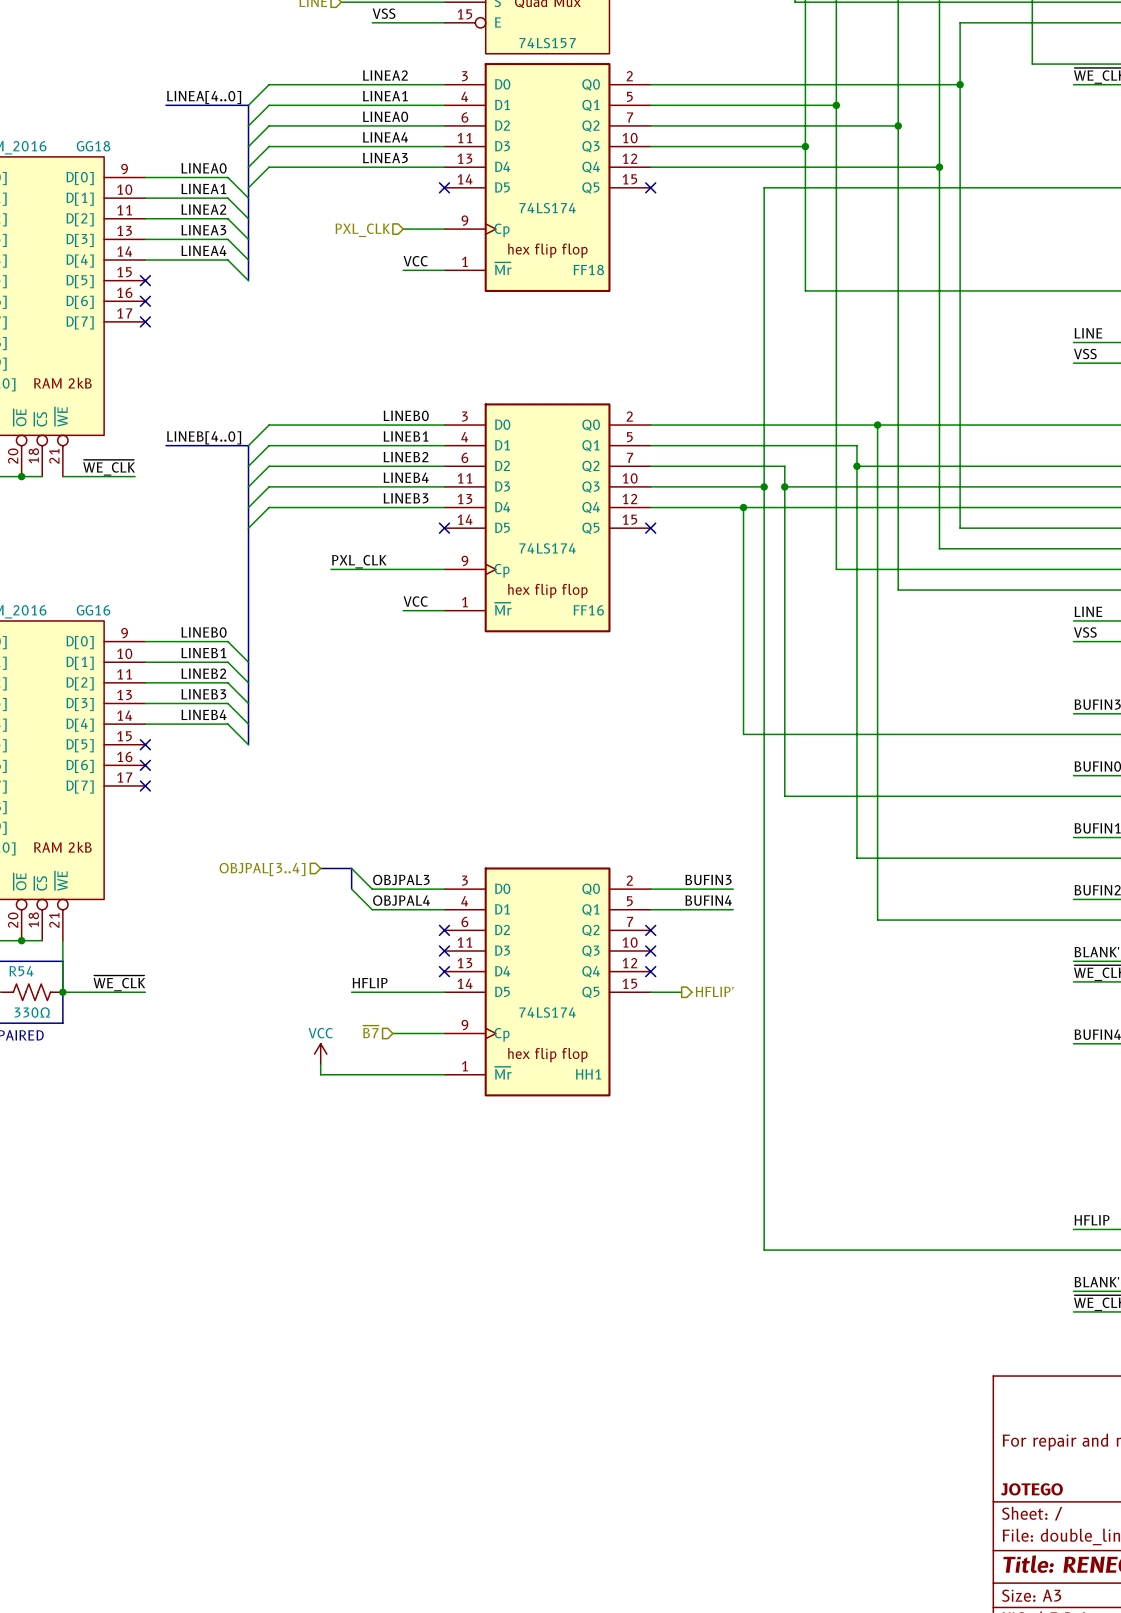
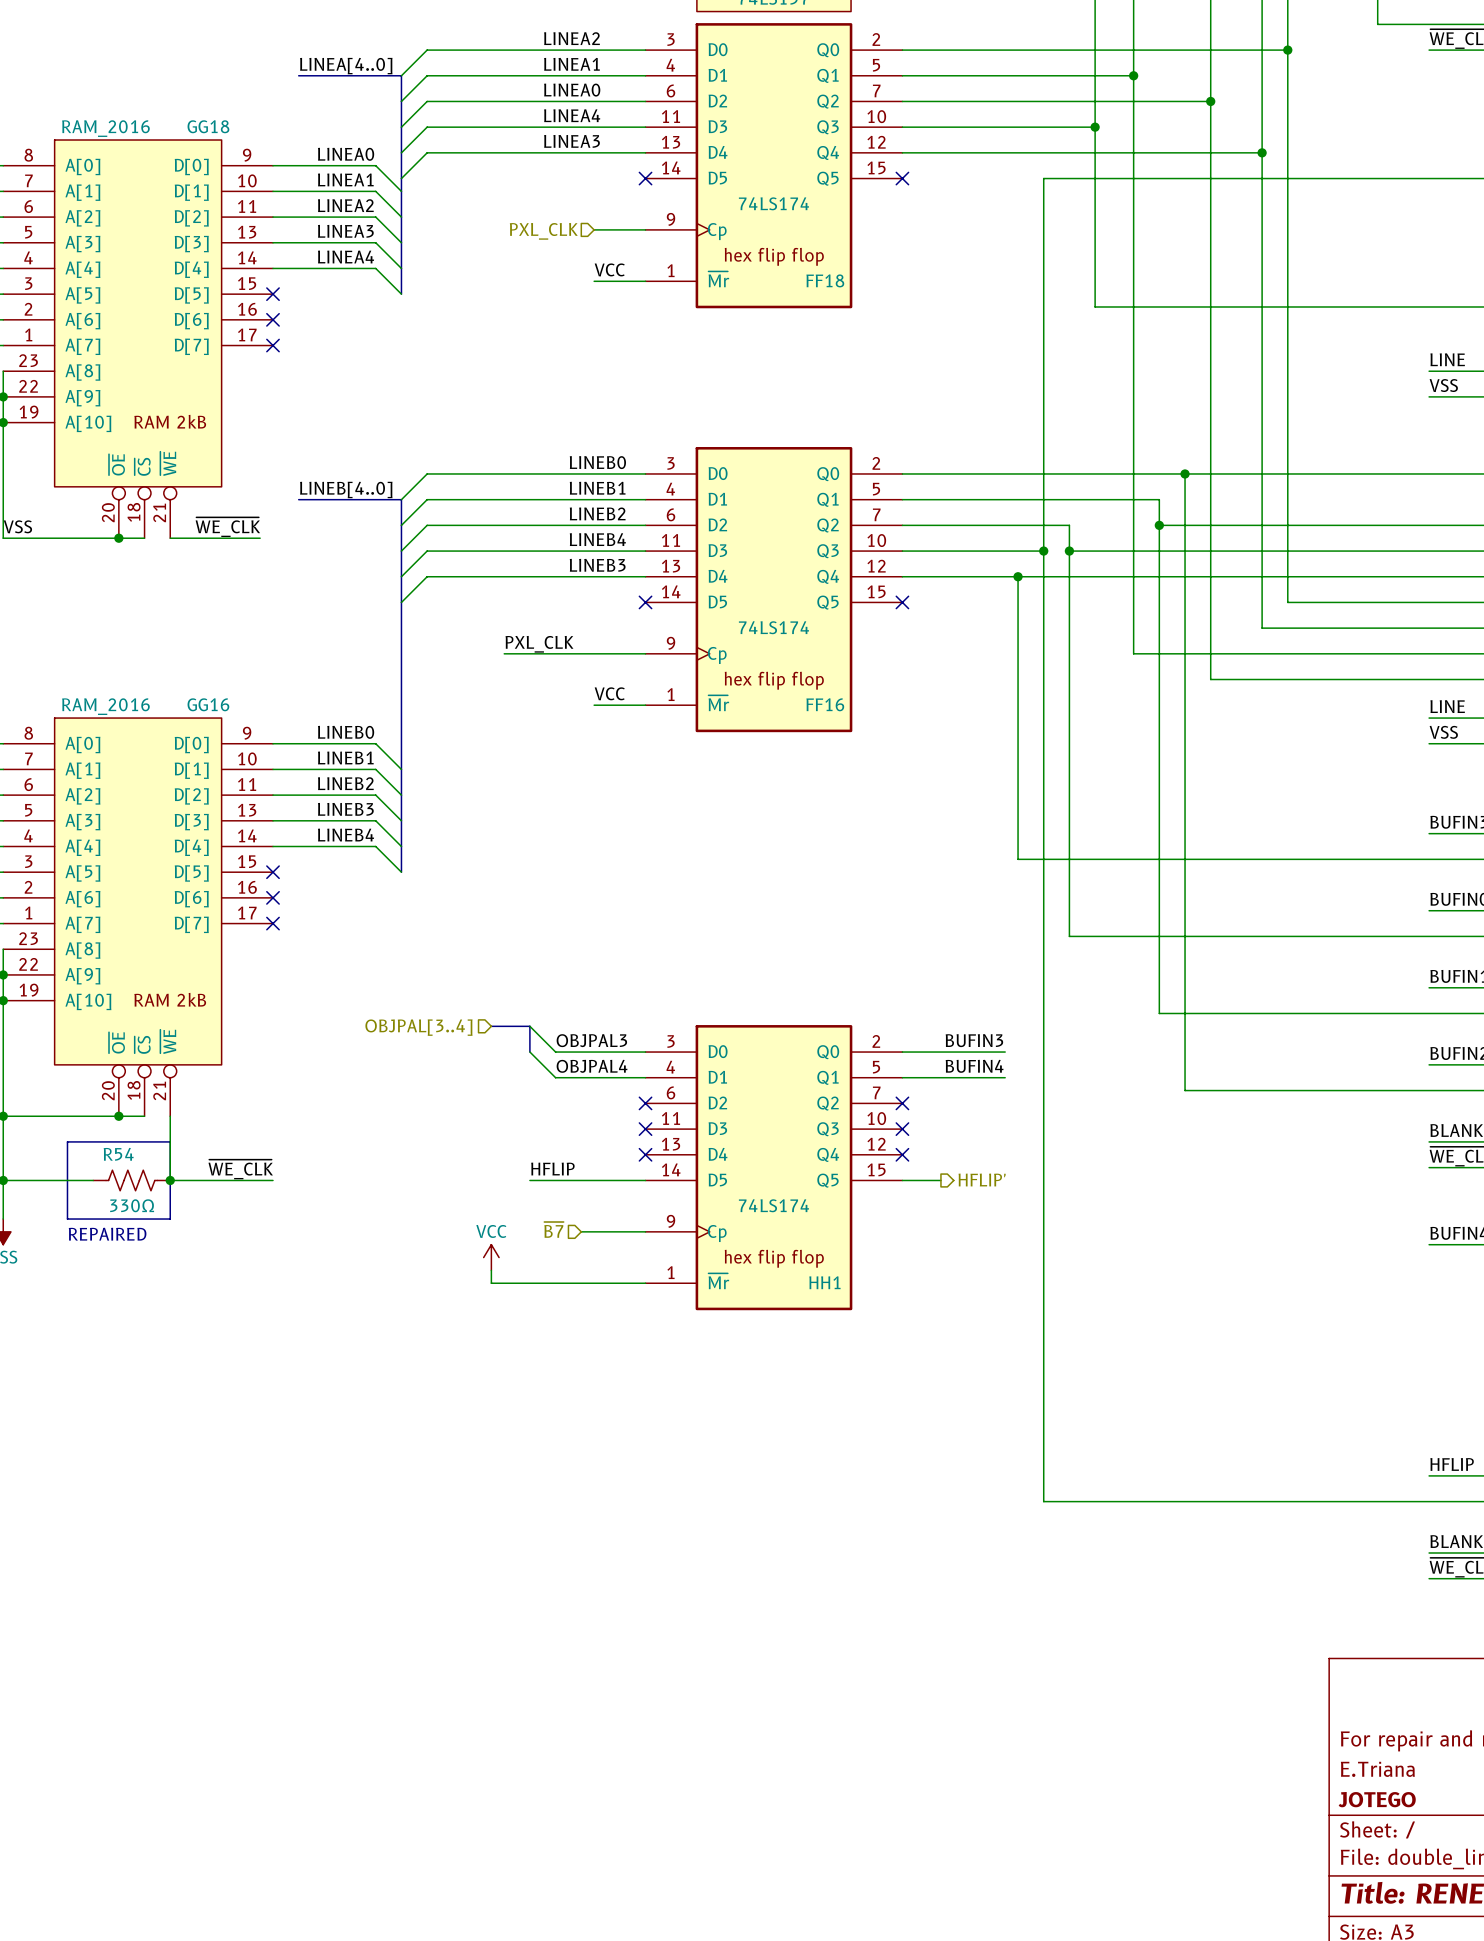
title block: none -> E.Triana (1377, 1769)

